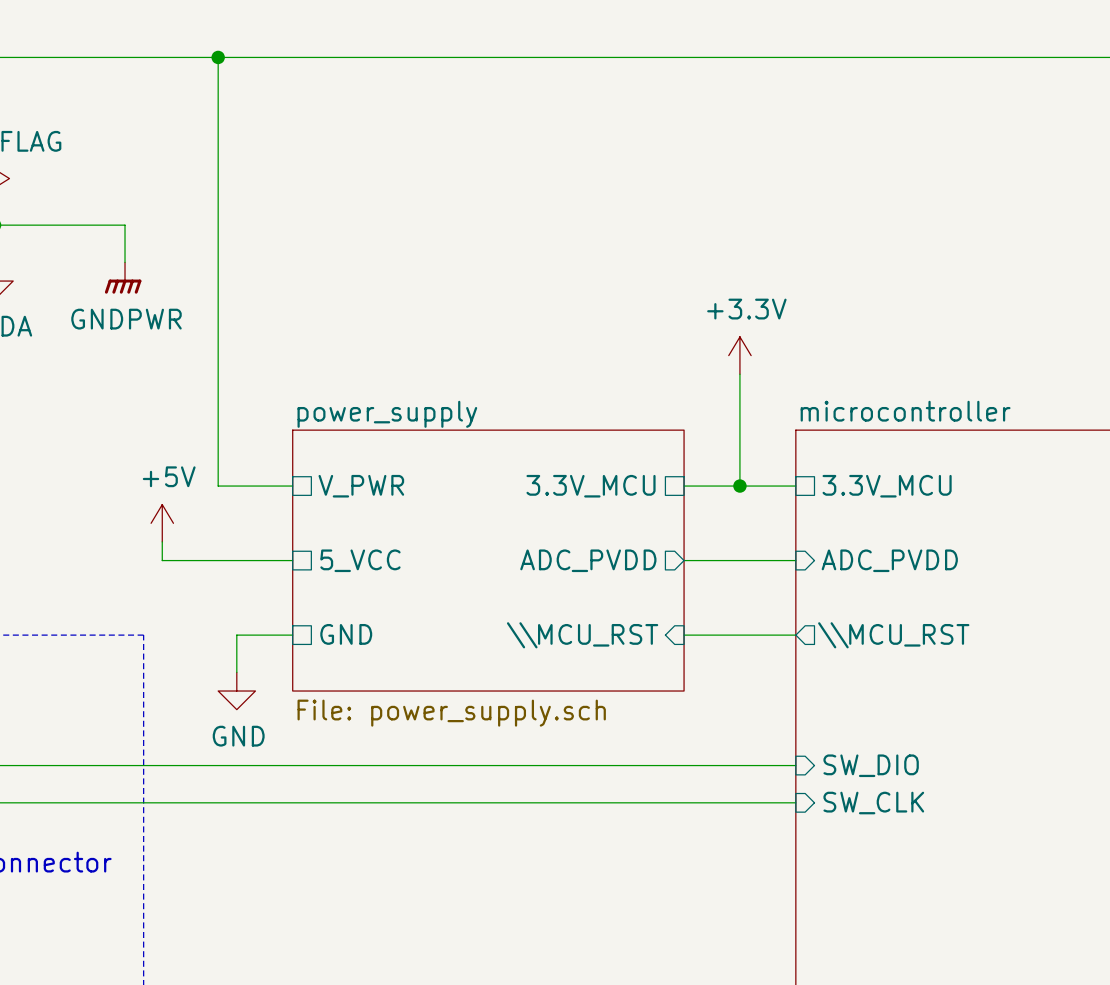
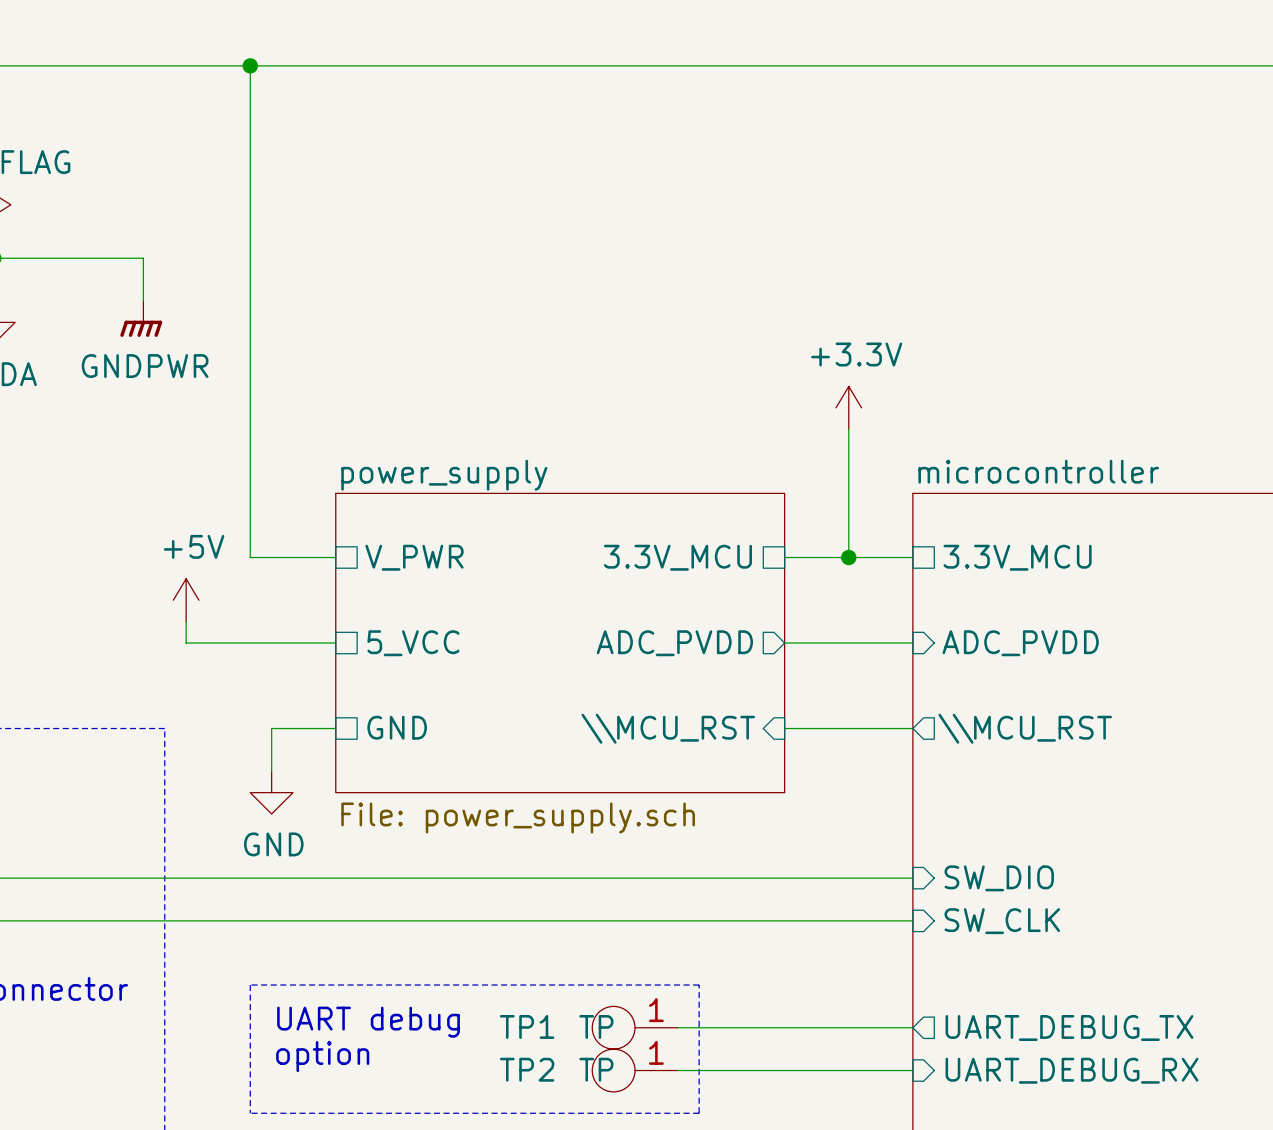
line: none -> (250, 985) (250, 1113) (699, 1113) (699, 985) (250, 985)
text: none -> UART debug (368, 1022)
TP1: none -> (635, 1027)
wire: none -> (677, 1027) (912, 1027)
sheet pin: none -> UART_DEBUG_TX (1069, 1027)
text: none -> option (322, 1056)
TP2: none -> (635, 1070)
wire: none -> (677, 1070) (912, 1070)
sheet pin: none -> UART_DEBUG_RX (1072, 1070)

